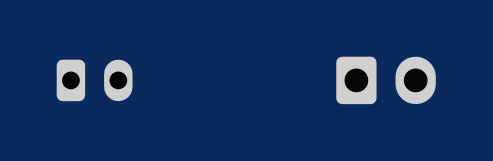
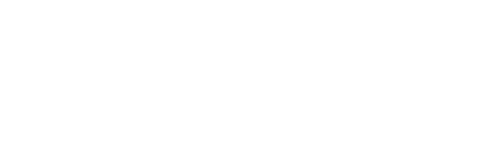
part: (94, 80) -> none
part: (386, 80) -> none

